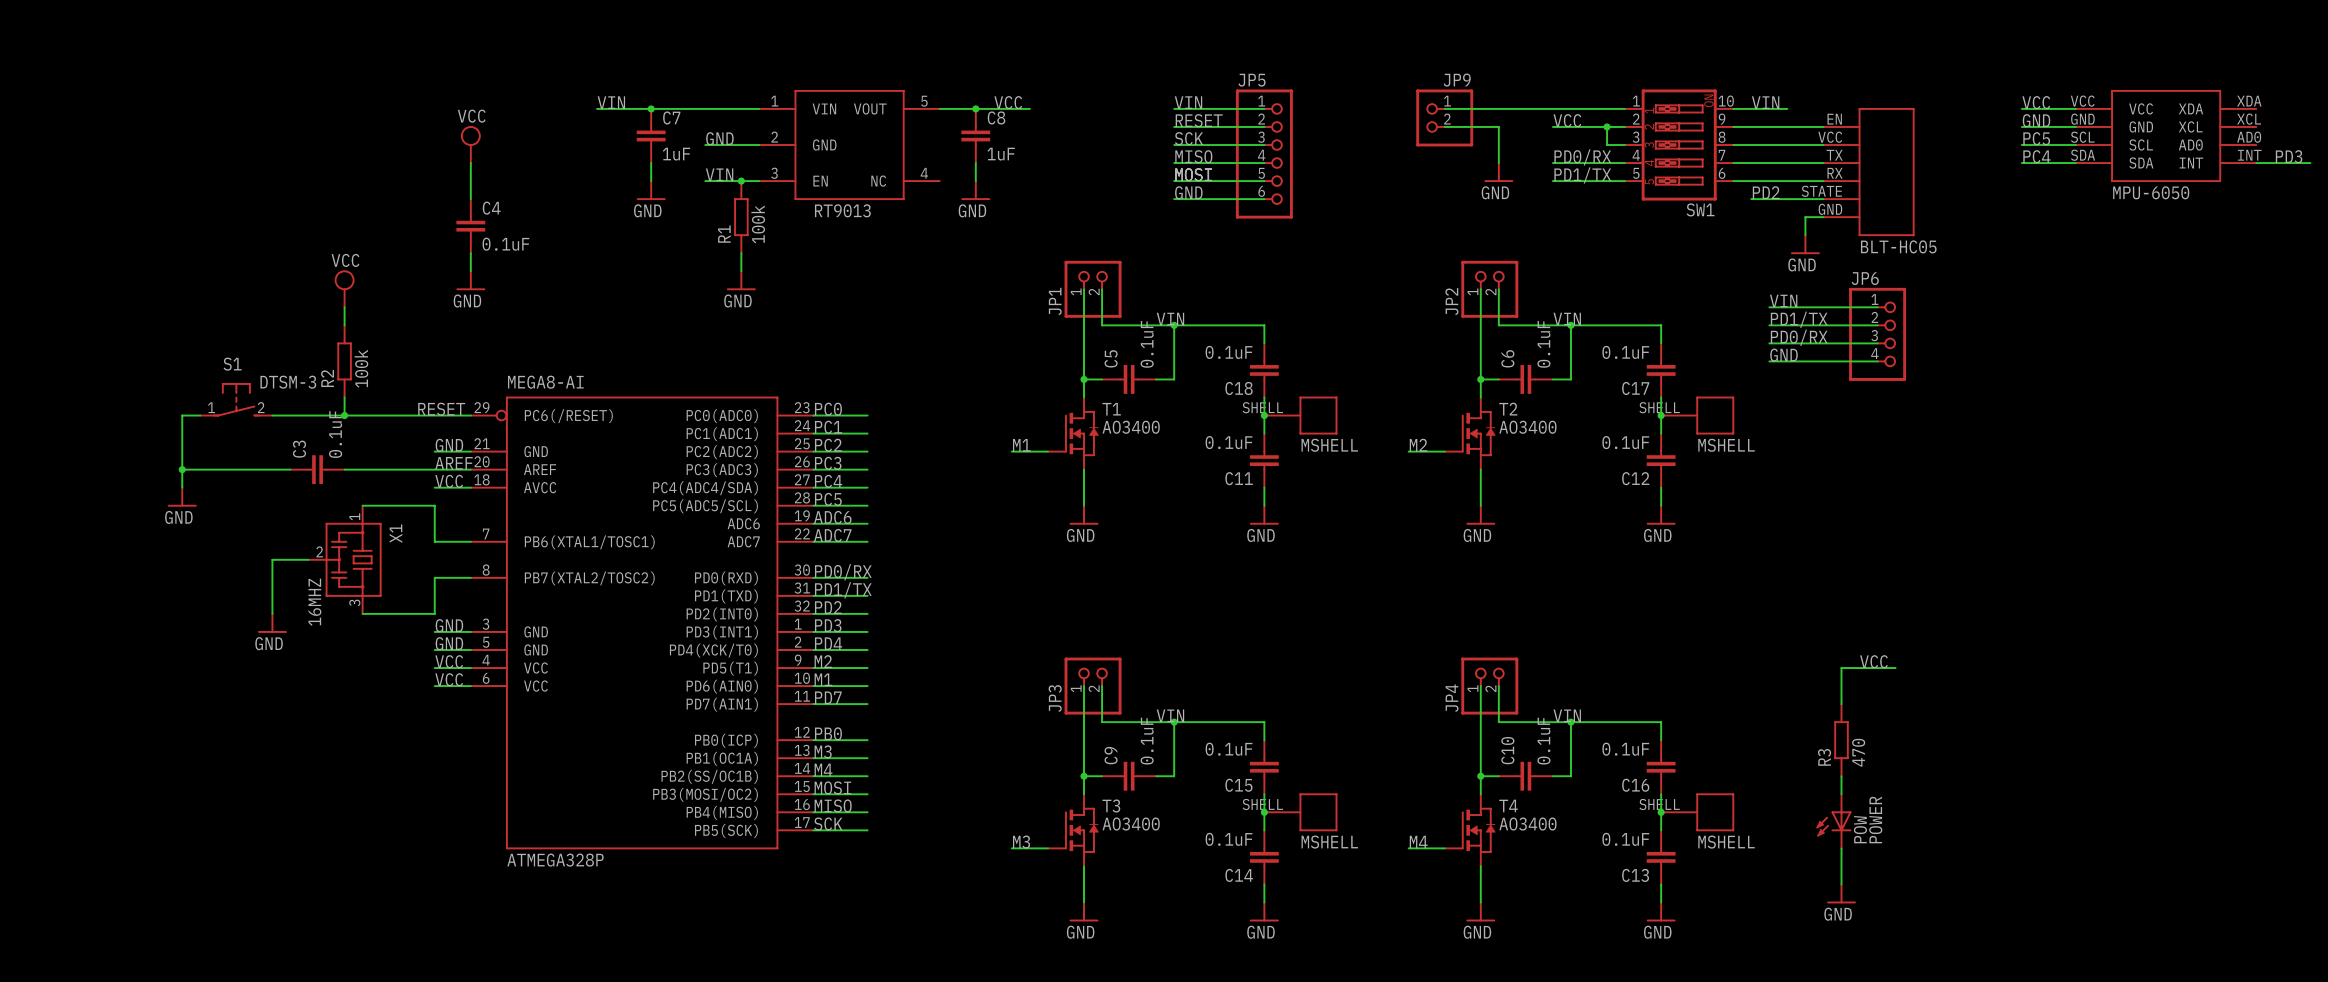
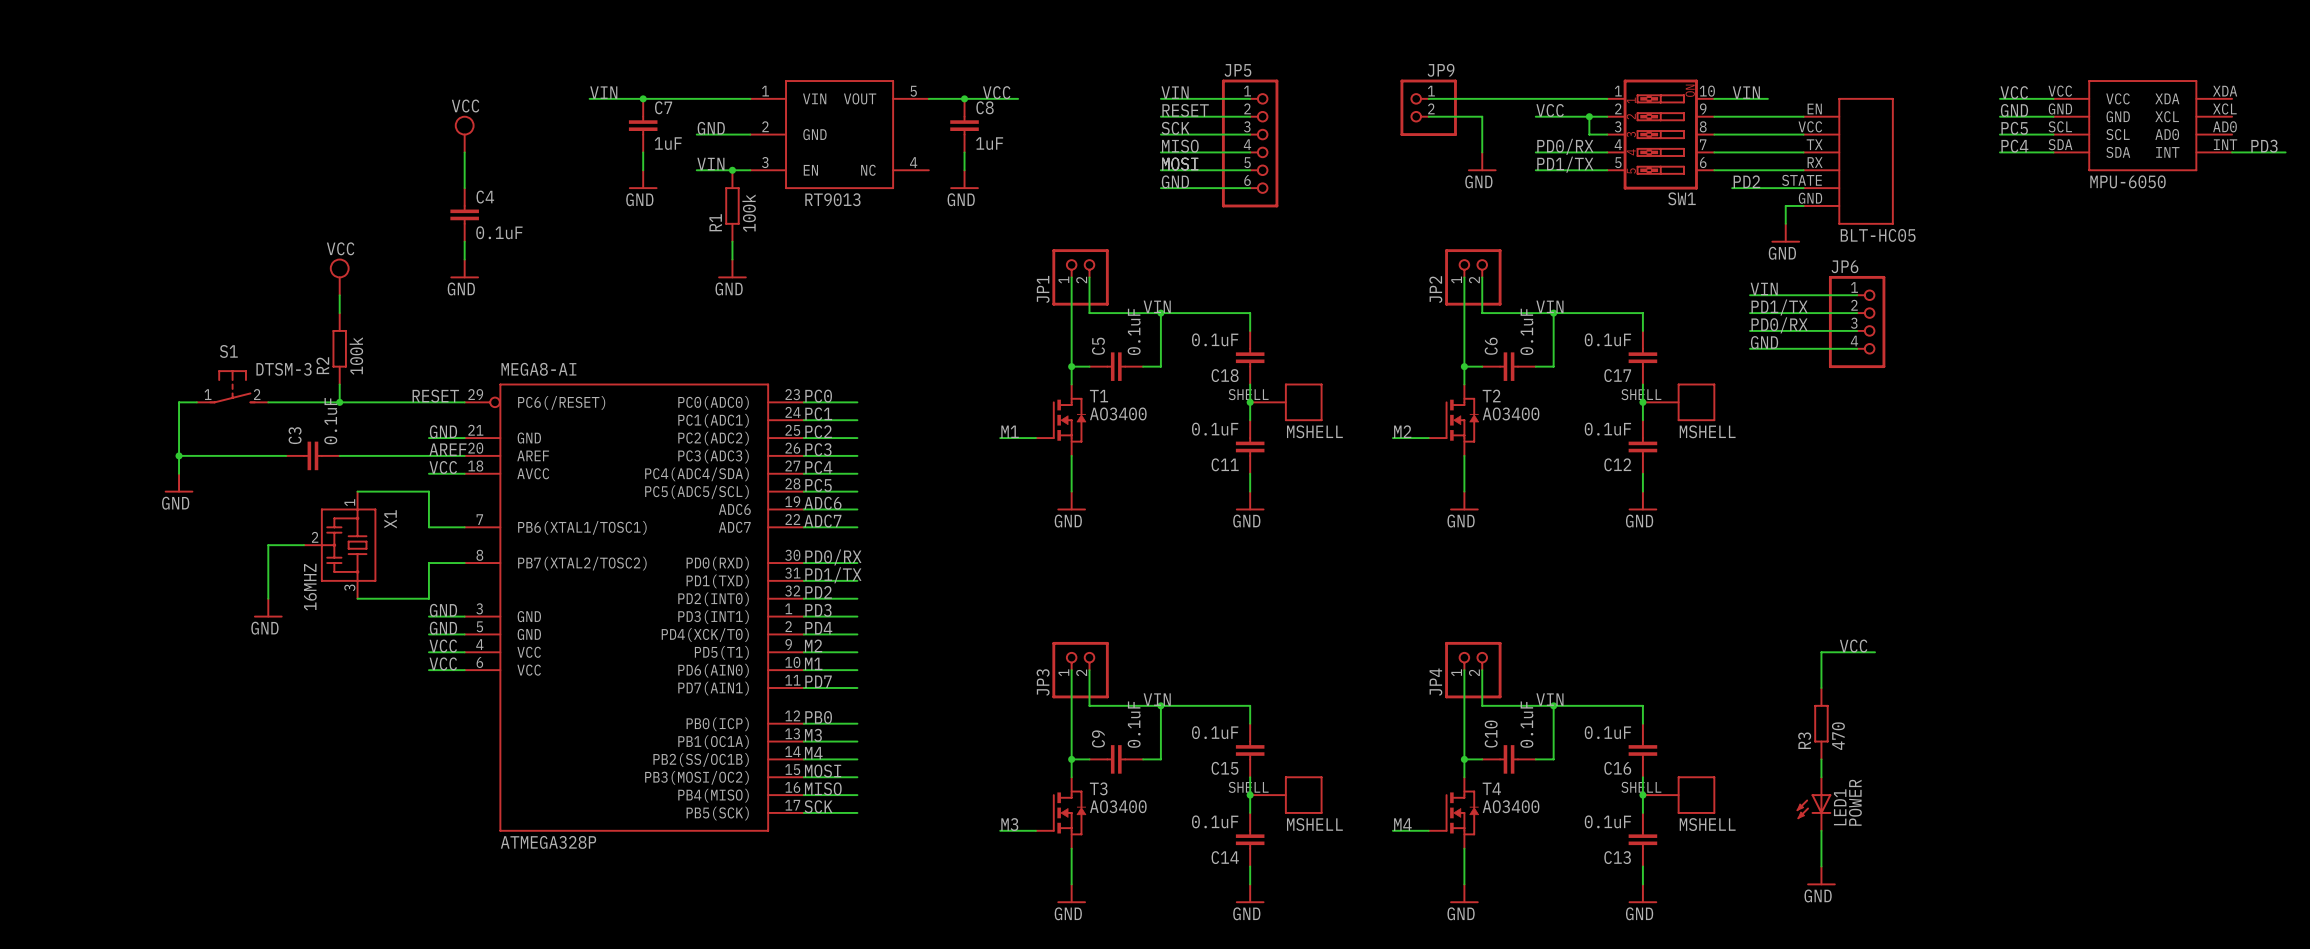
POW name: POW (1860, 829) -> LED1 (1840, 807)

